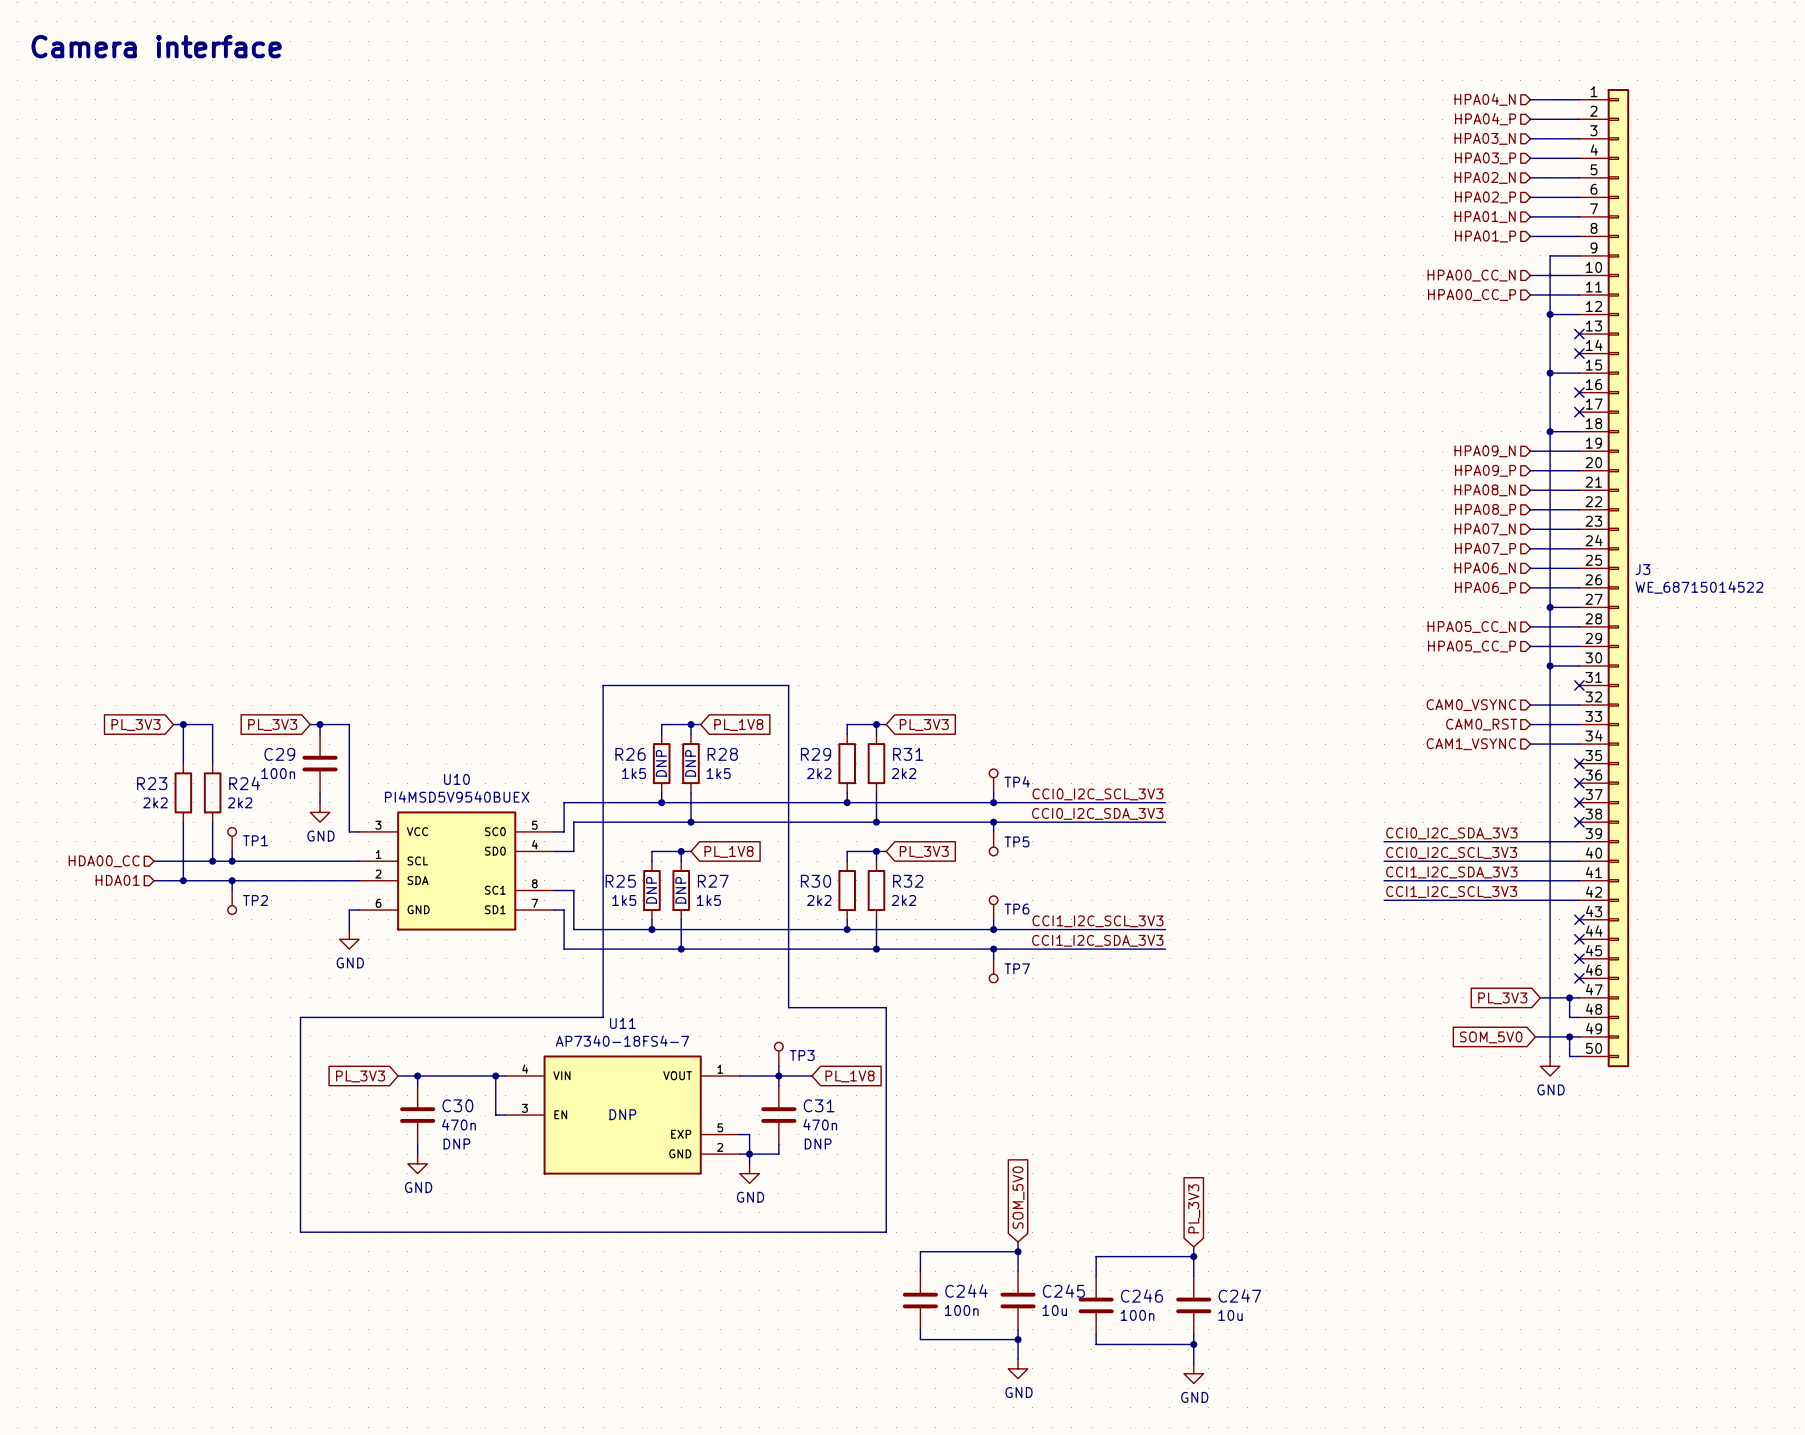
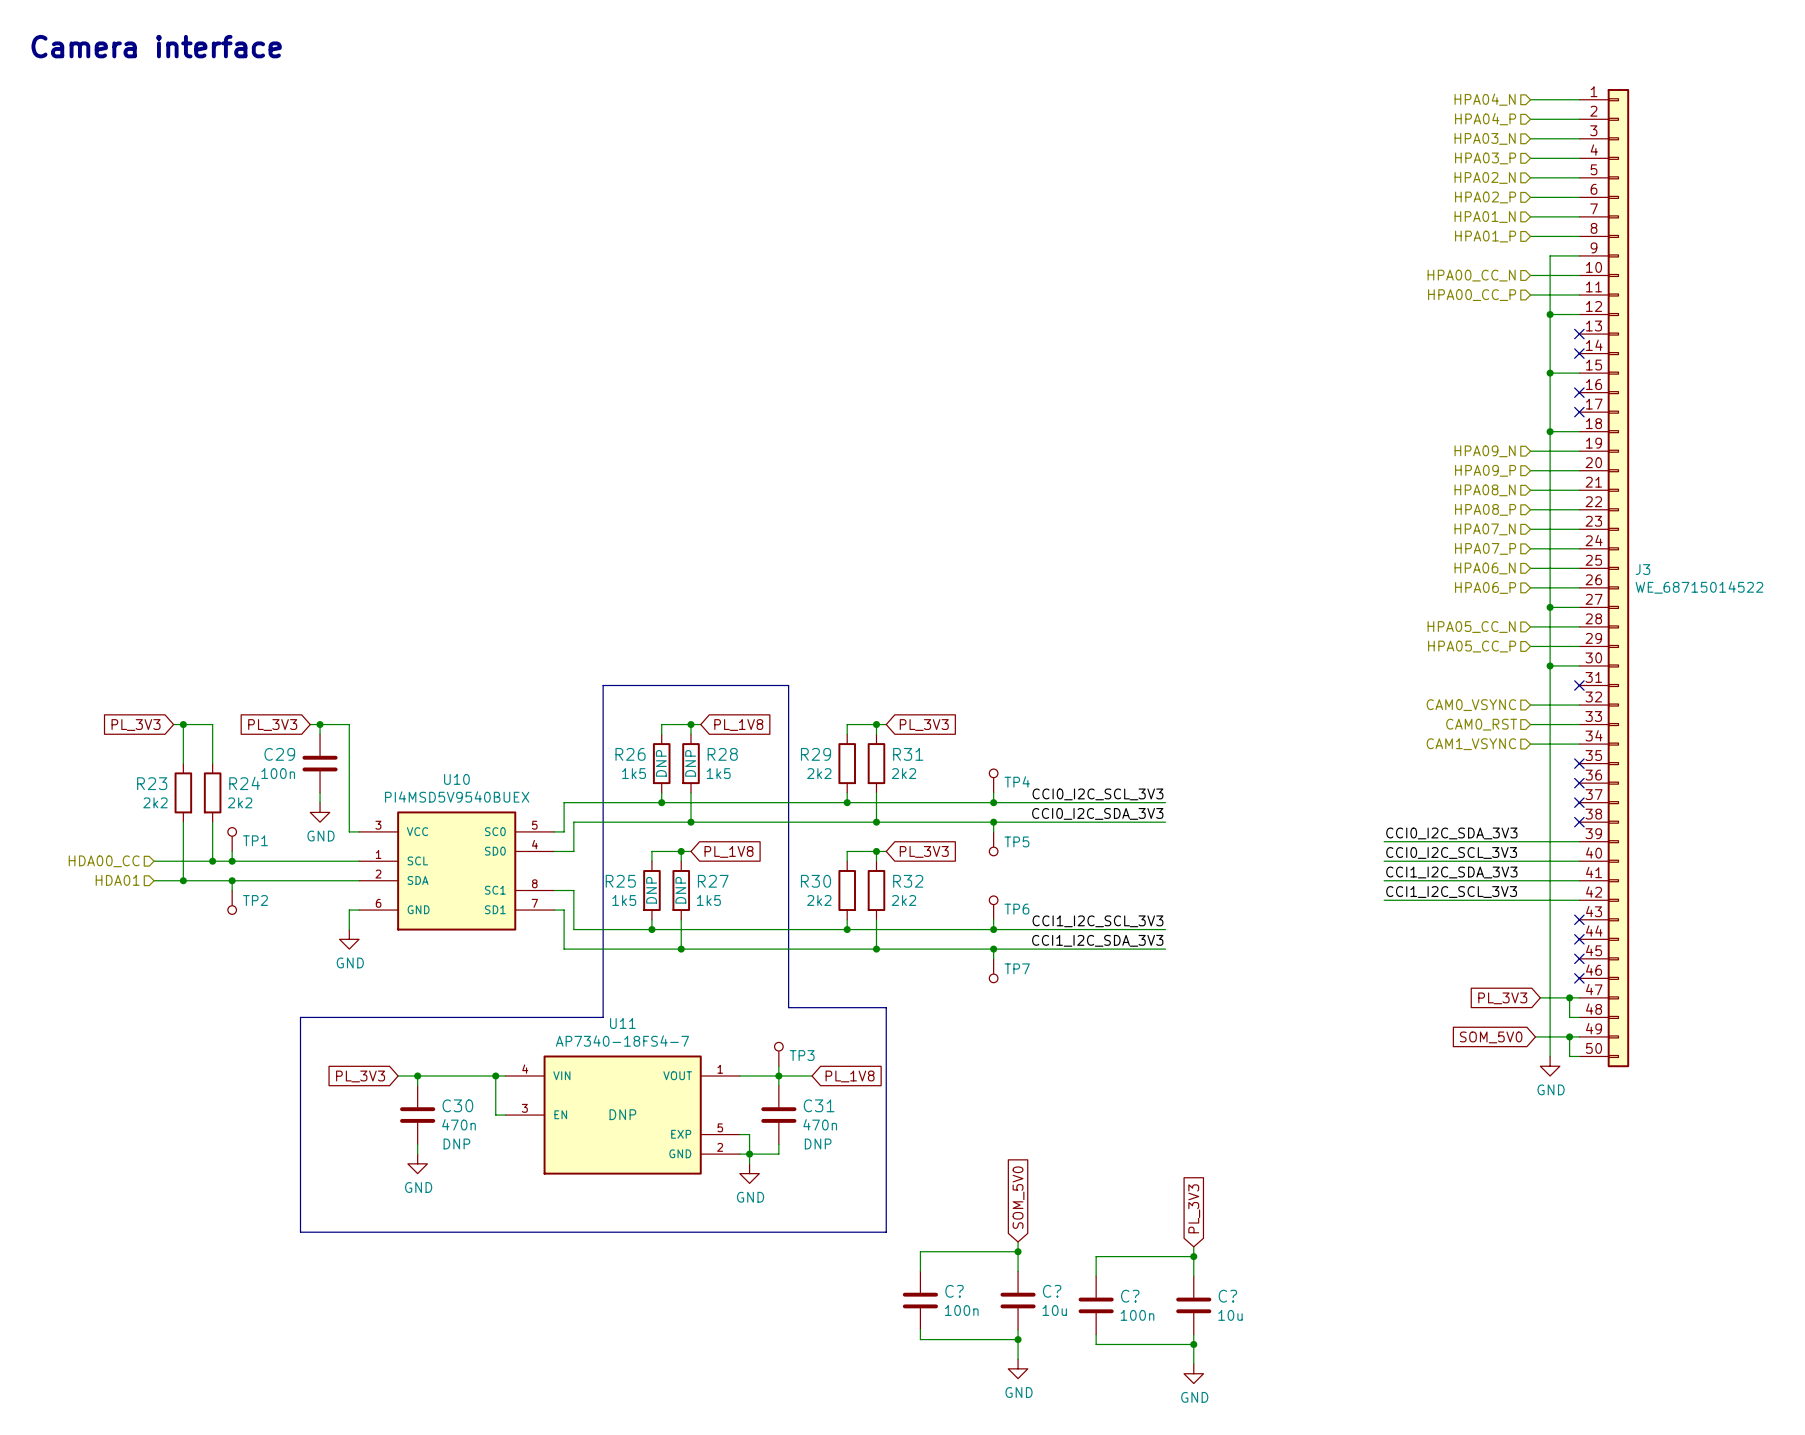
C244 name: C244 (966, 1291) -> C? (954, 1291)
C245 name: C245 (1063, 1291) -> C? (1052, 1291)
C246 name: C246 (1141, 1295) -> C? (1130, 1296)
C247 name: C247 (1239, 1295) -> C? (1227, 1296)

